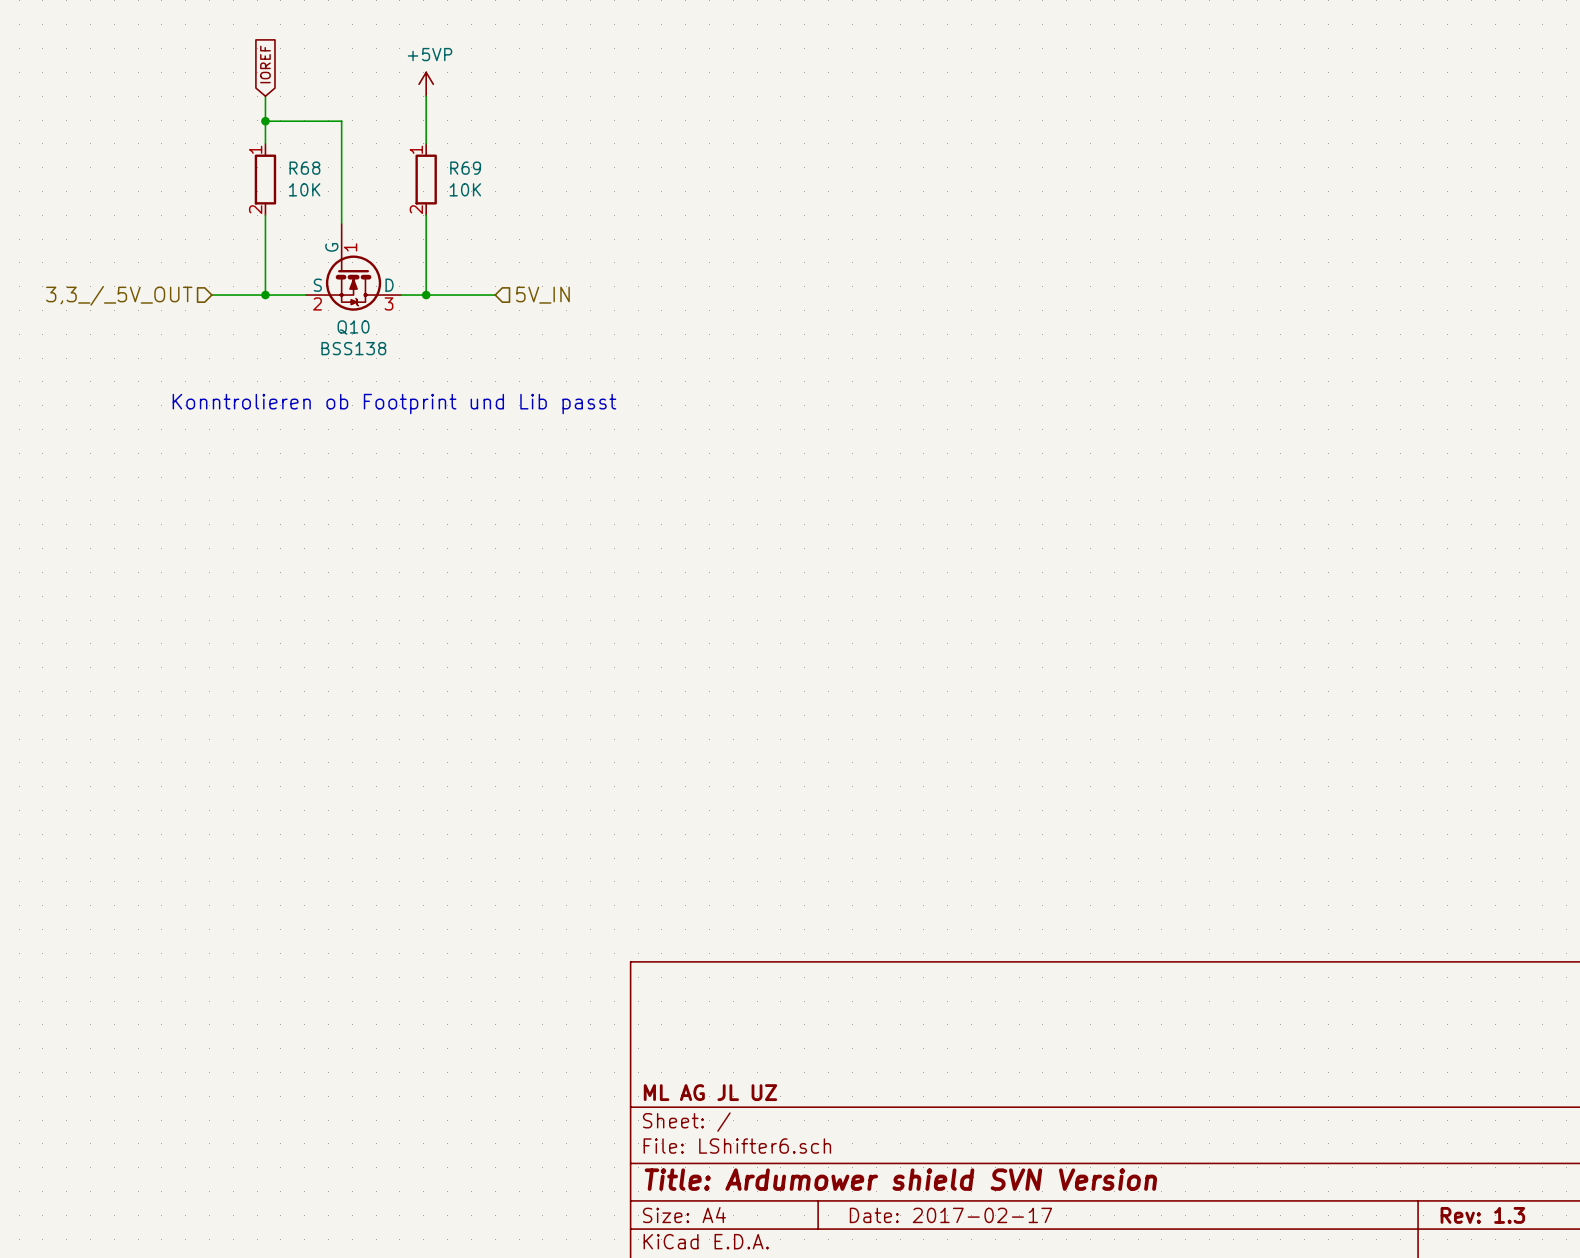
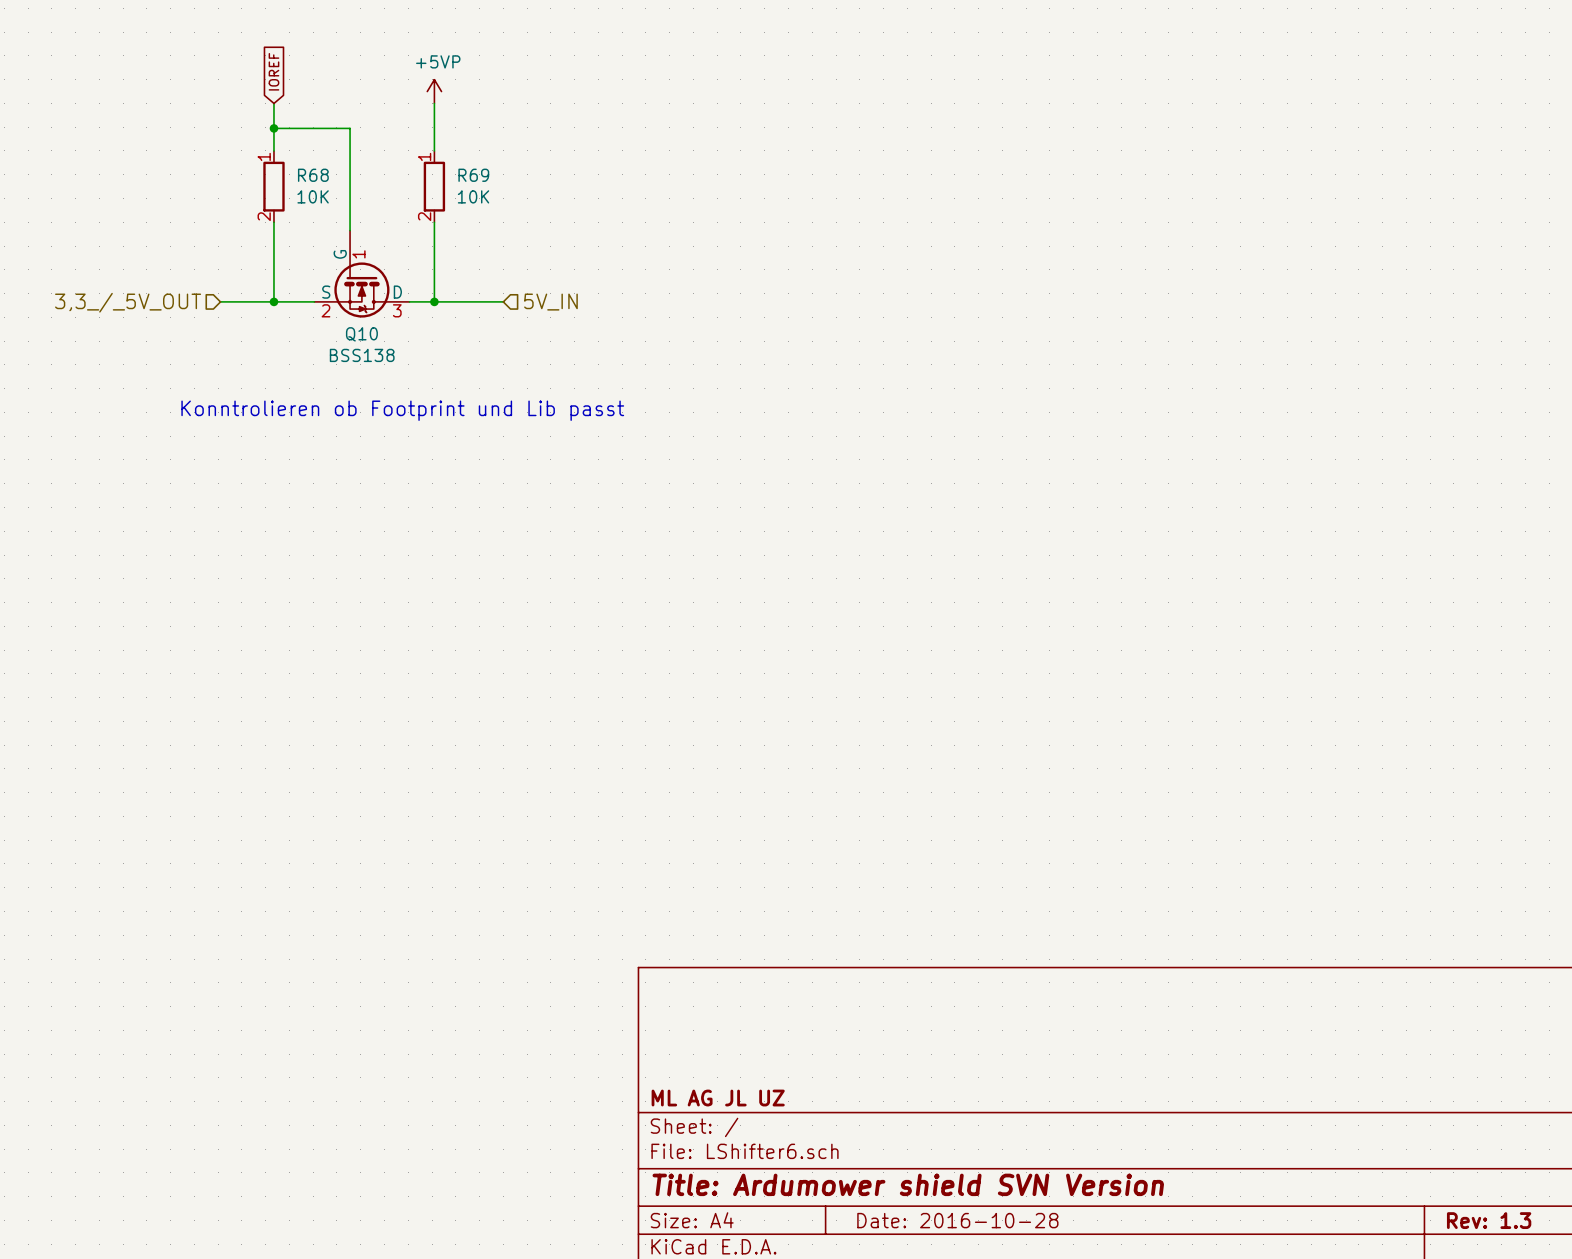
title block: Date: 2017-02-17 (950, 1215) -> Date: 2016-10-28 (957, 1220)

